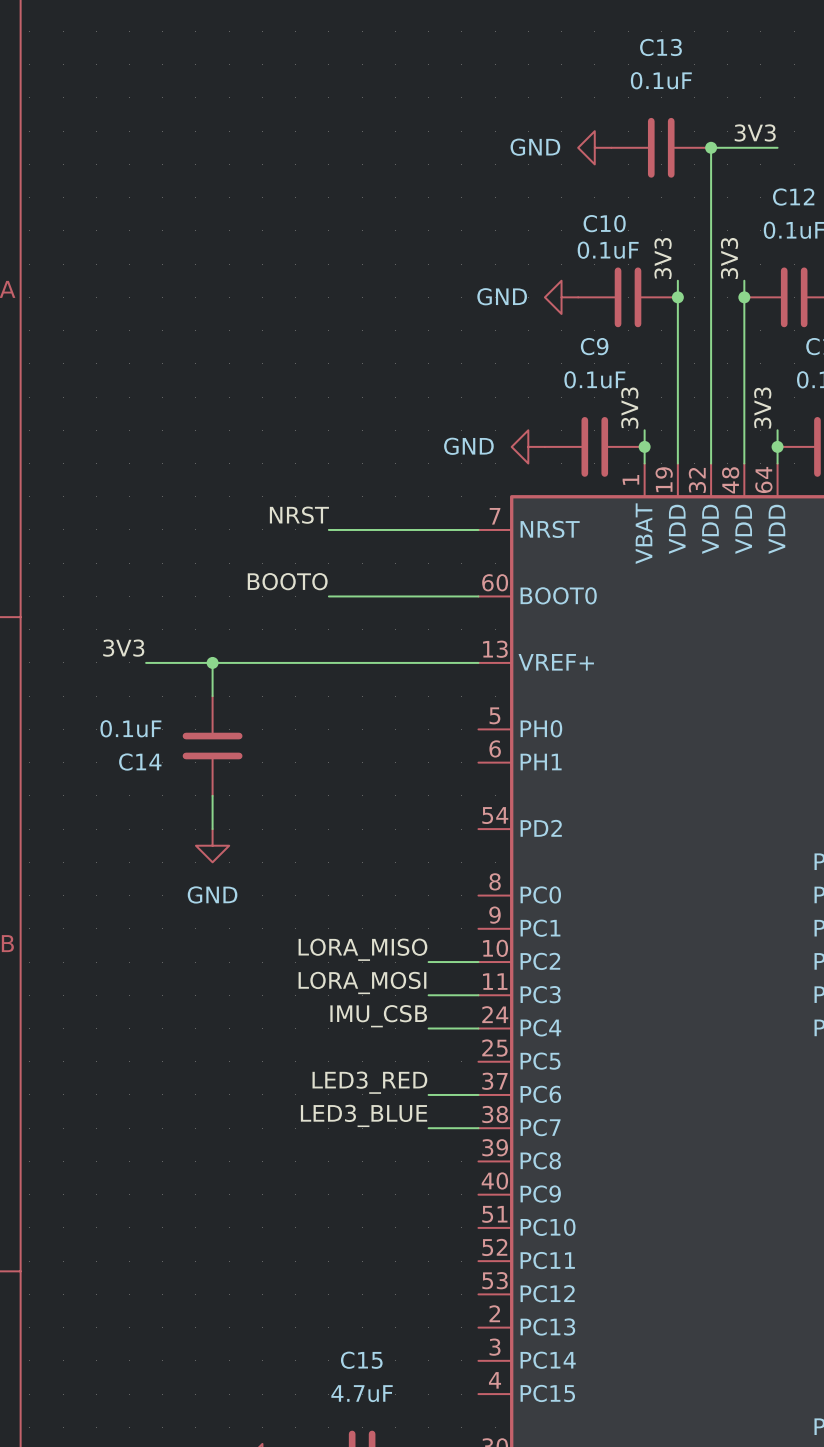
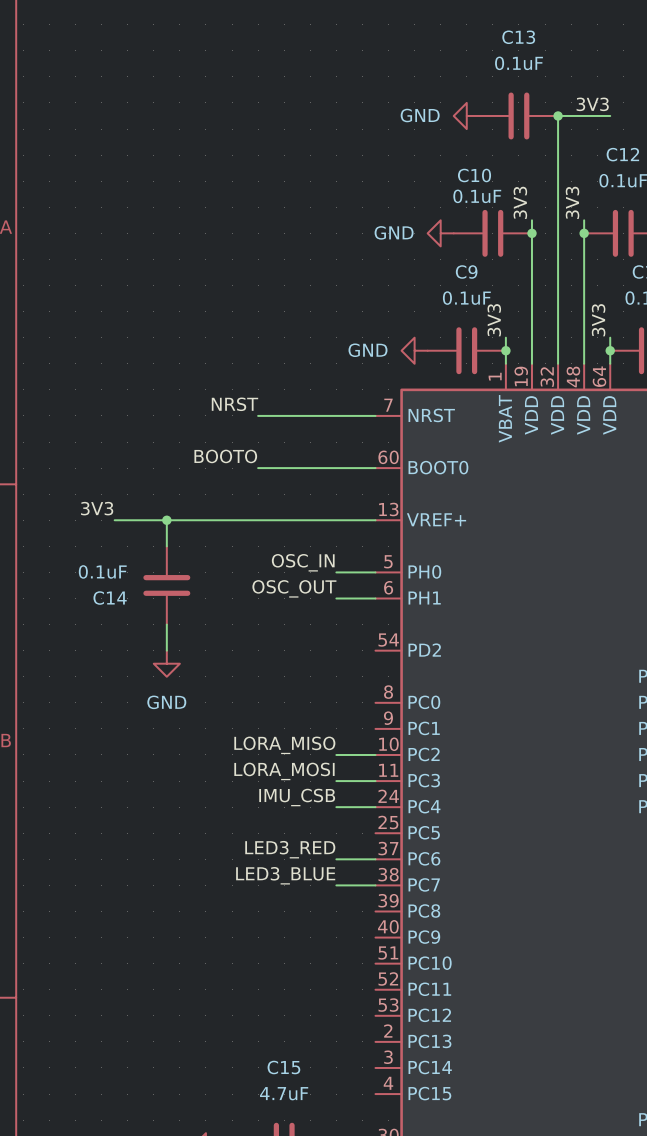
label: none -> OSC_IN (303, 562)
wire: none -> (336, 572) (375, 572)
label: none -> OSC_OUT (294, 588)
wire: none -> (336, 598) (375, 598)

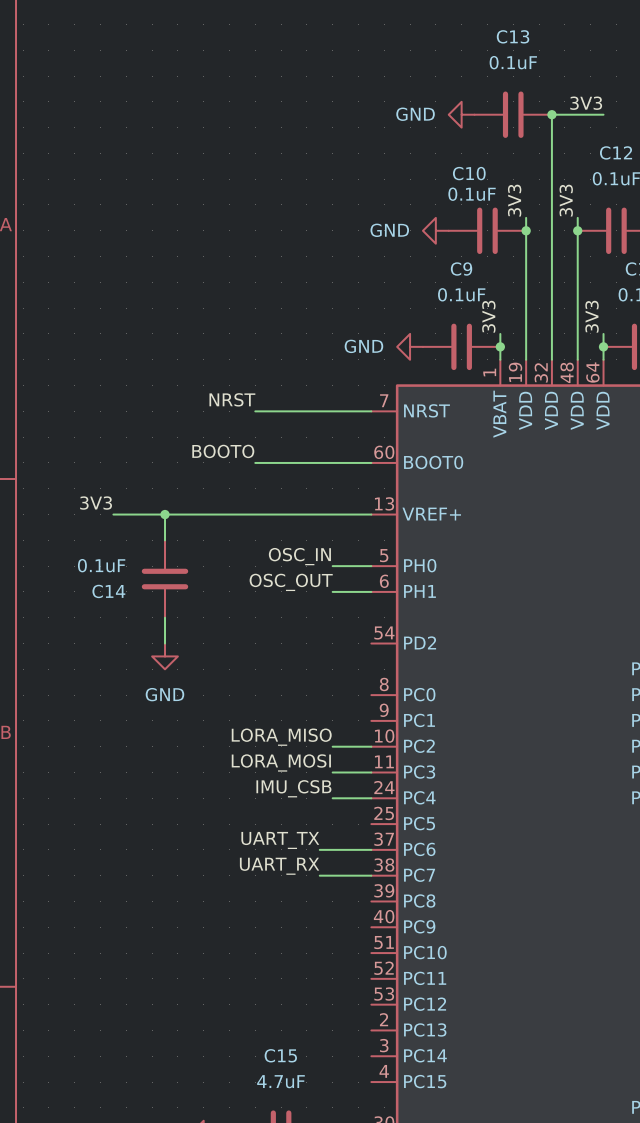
label: none -> UART_TX (280, 840)
label: LED3_RED (290, 849) -> none
wire: none -> (319, 849) (332, 849)
label: none -> UART_RX (279, 866)
label: LED3_BLUE (285, 875) -> none
wire: none -> (319, 875) (332, 875)

